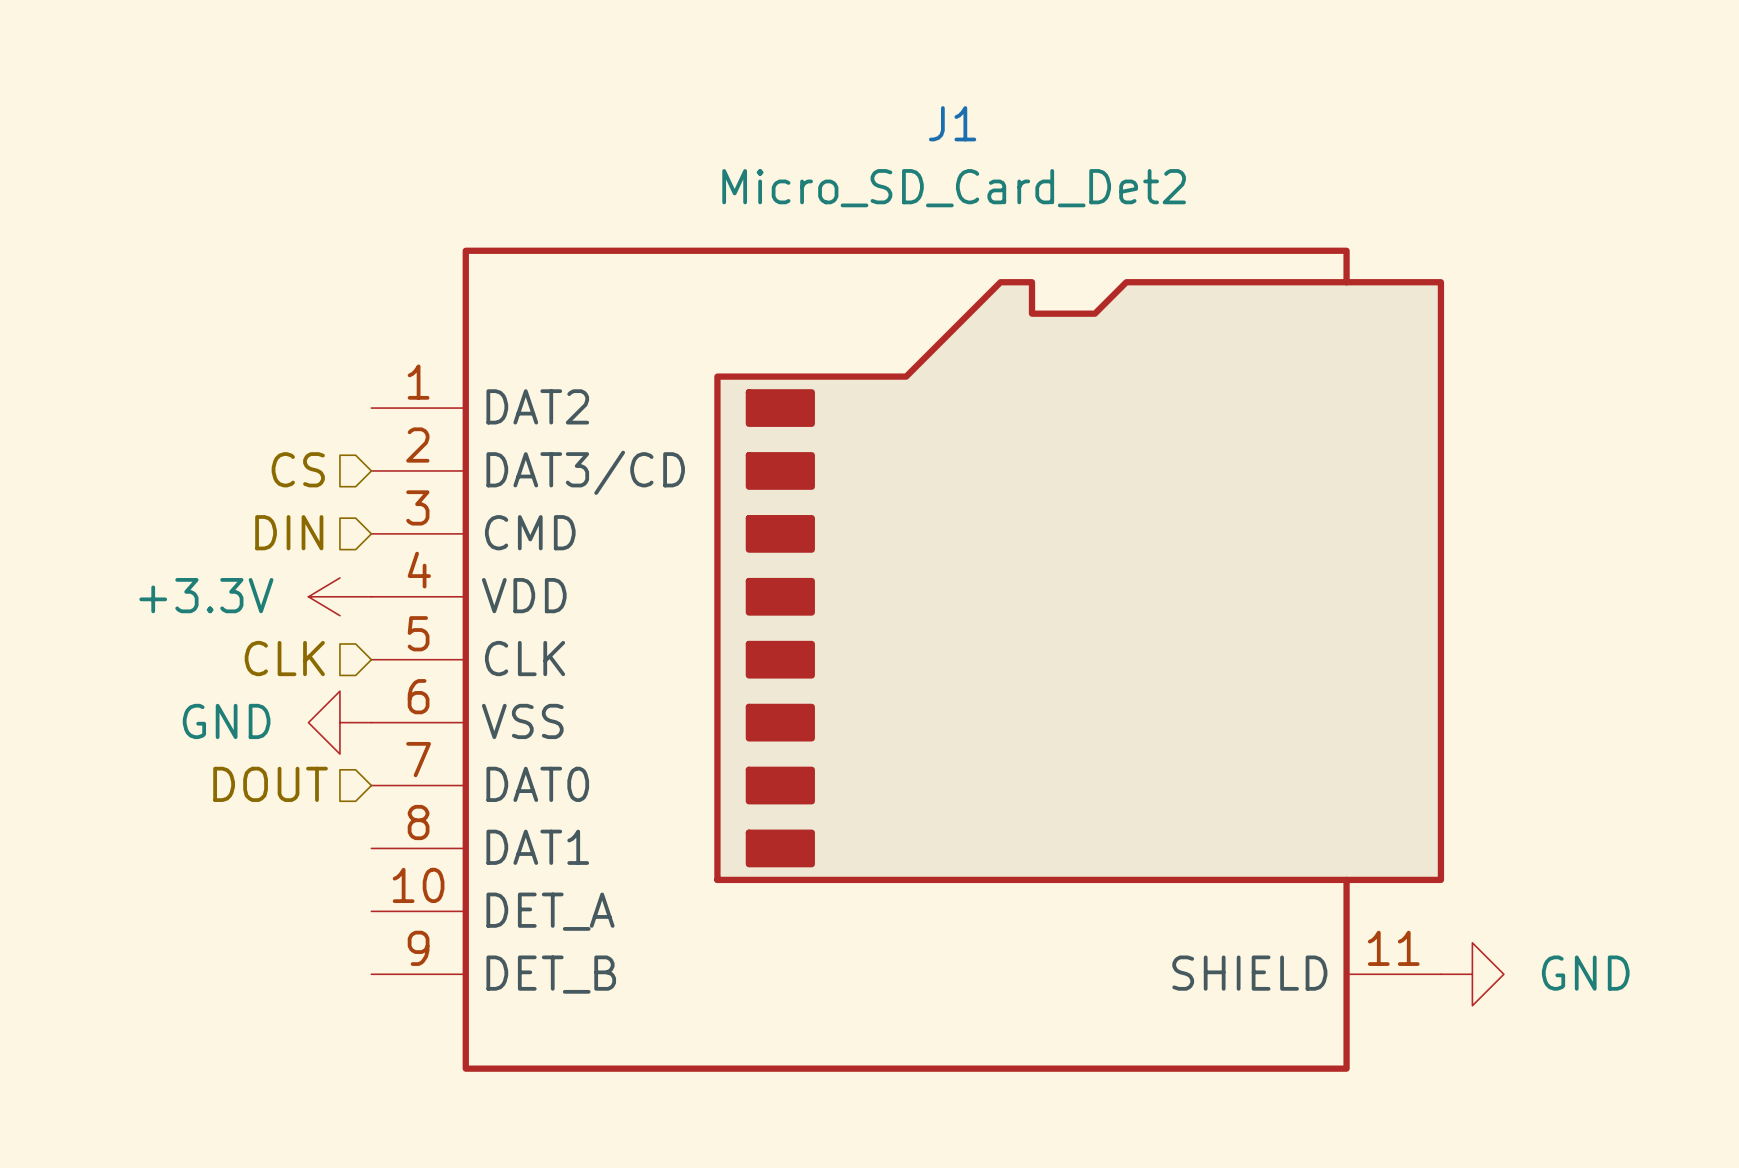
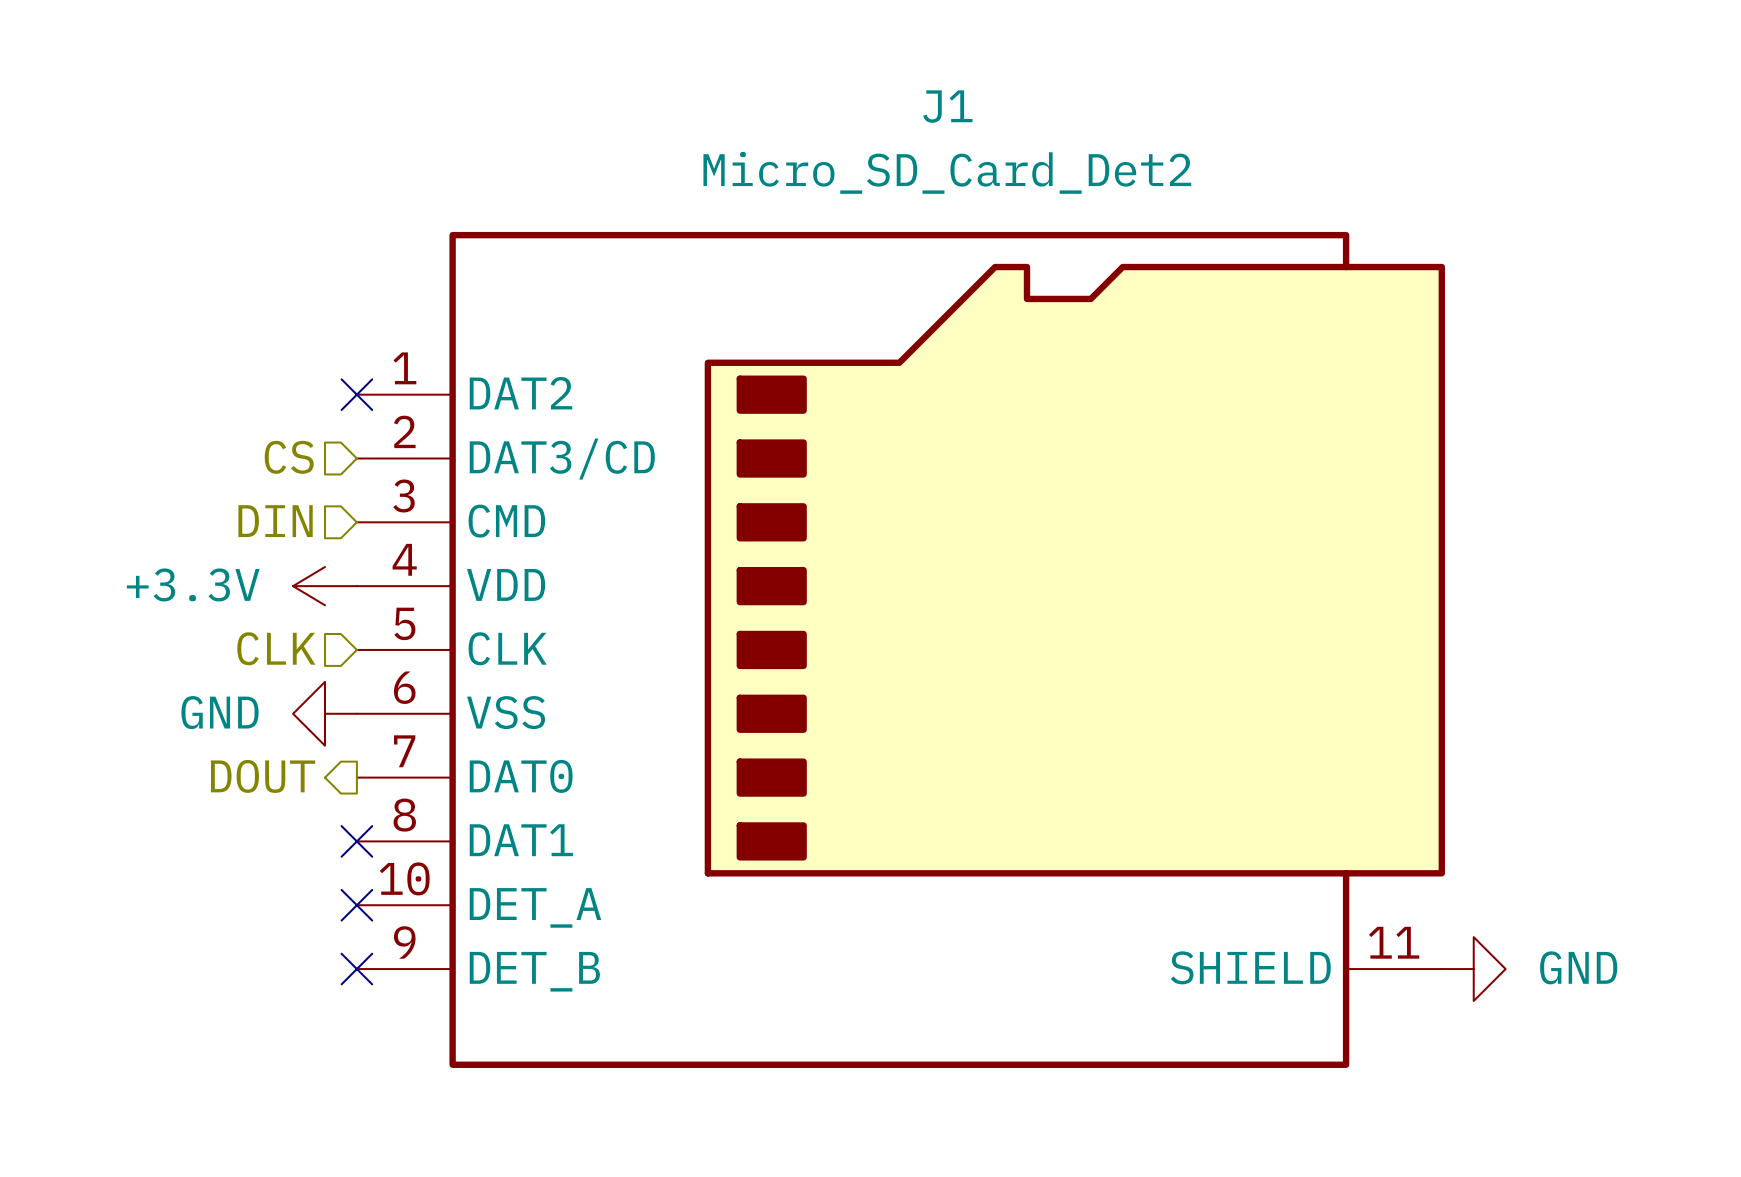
no-connect mark: none -> (356, 394)
hierarchical label shape: input (270, 784) -> output (263, 776)
no-connect mark: none -> (356, 841)
no-connect mark: none -> (356, 905)
no-connect mark: none -> (356, 969)

